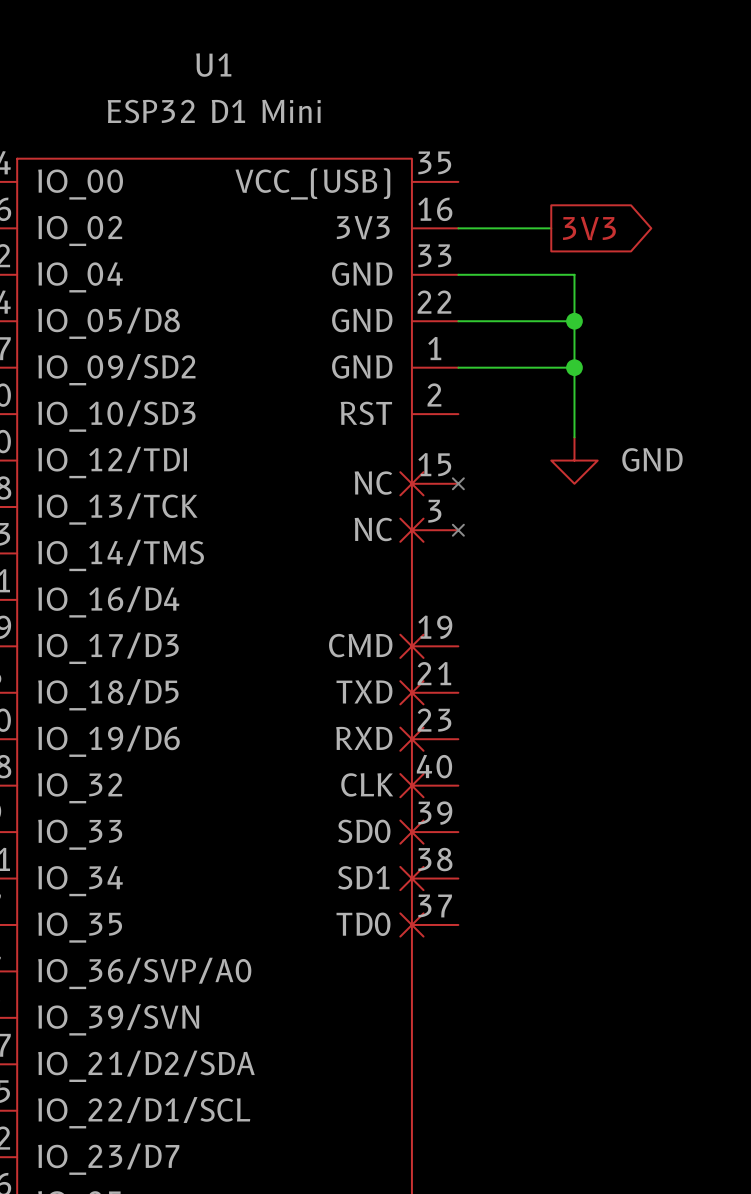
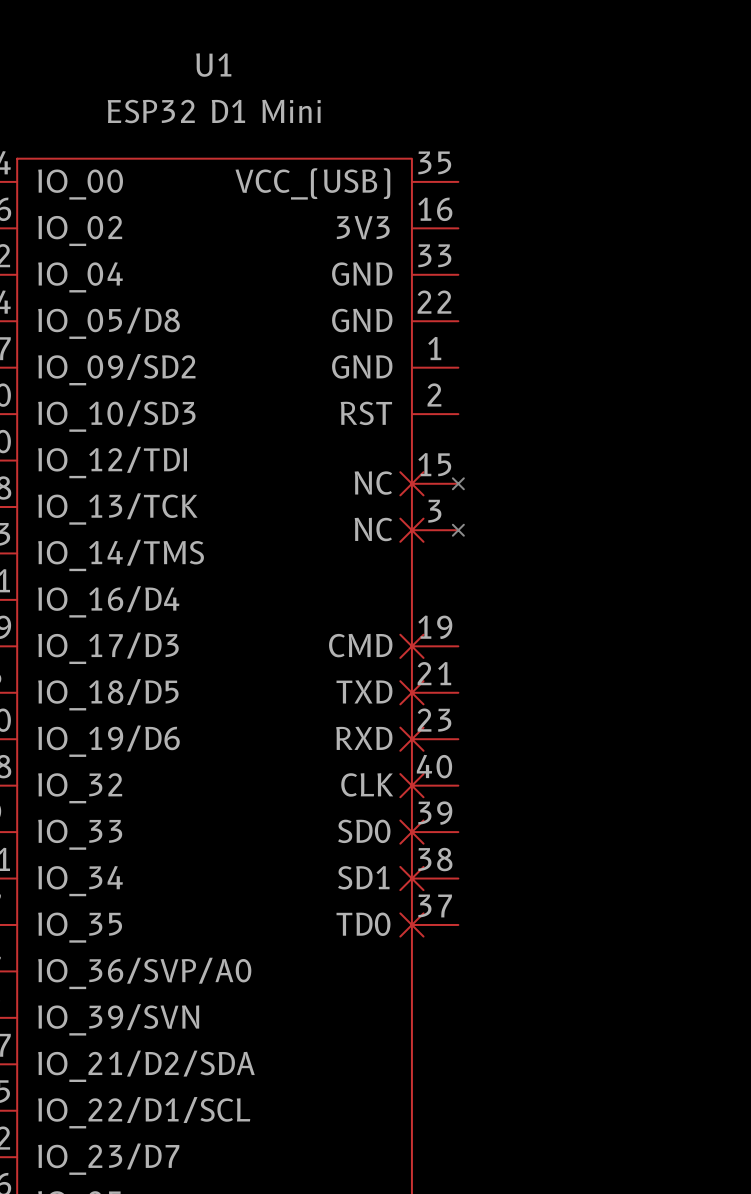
wire: (458, 228) (551, 228) -> none
global label: 3V3 (589, 228) -> none
wire: (458, 274) (574, 274) (574, 437) -> none
wire: (458, 321) (574, 321) -> none
junction: (574, 321) -> none
wire: (458, 367) (574, 367) -> none
junction: (574, 367) -> none
power symbol: GND (574, 460) -> none

